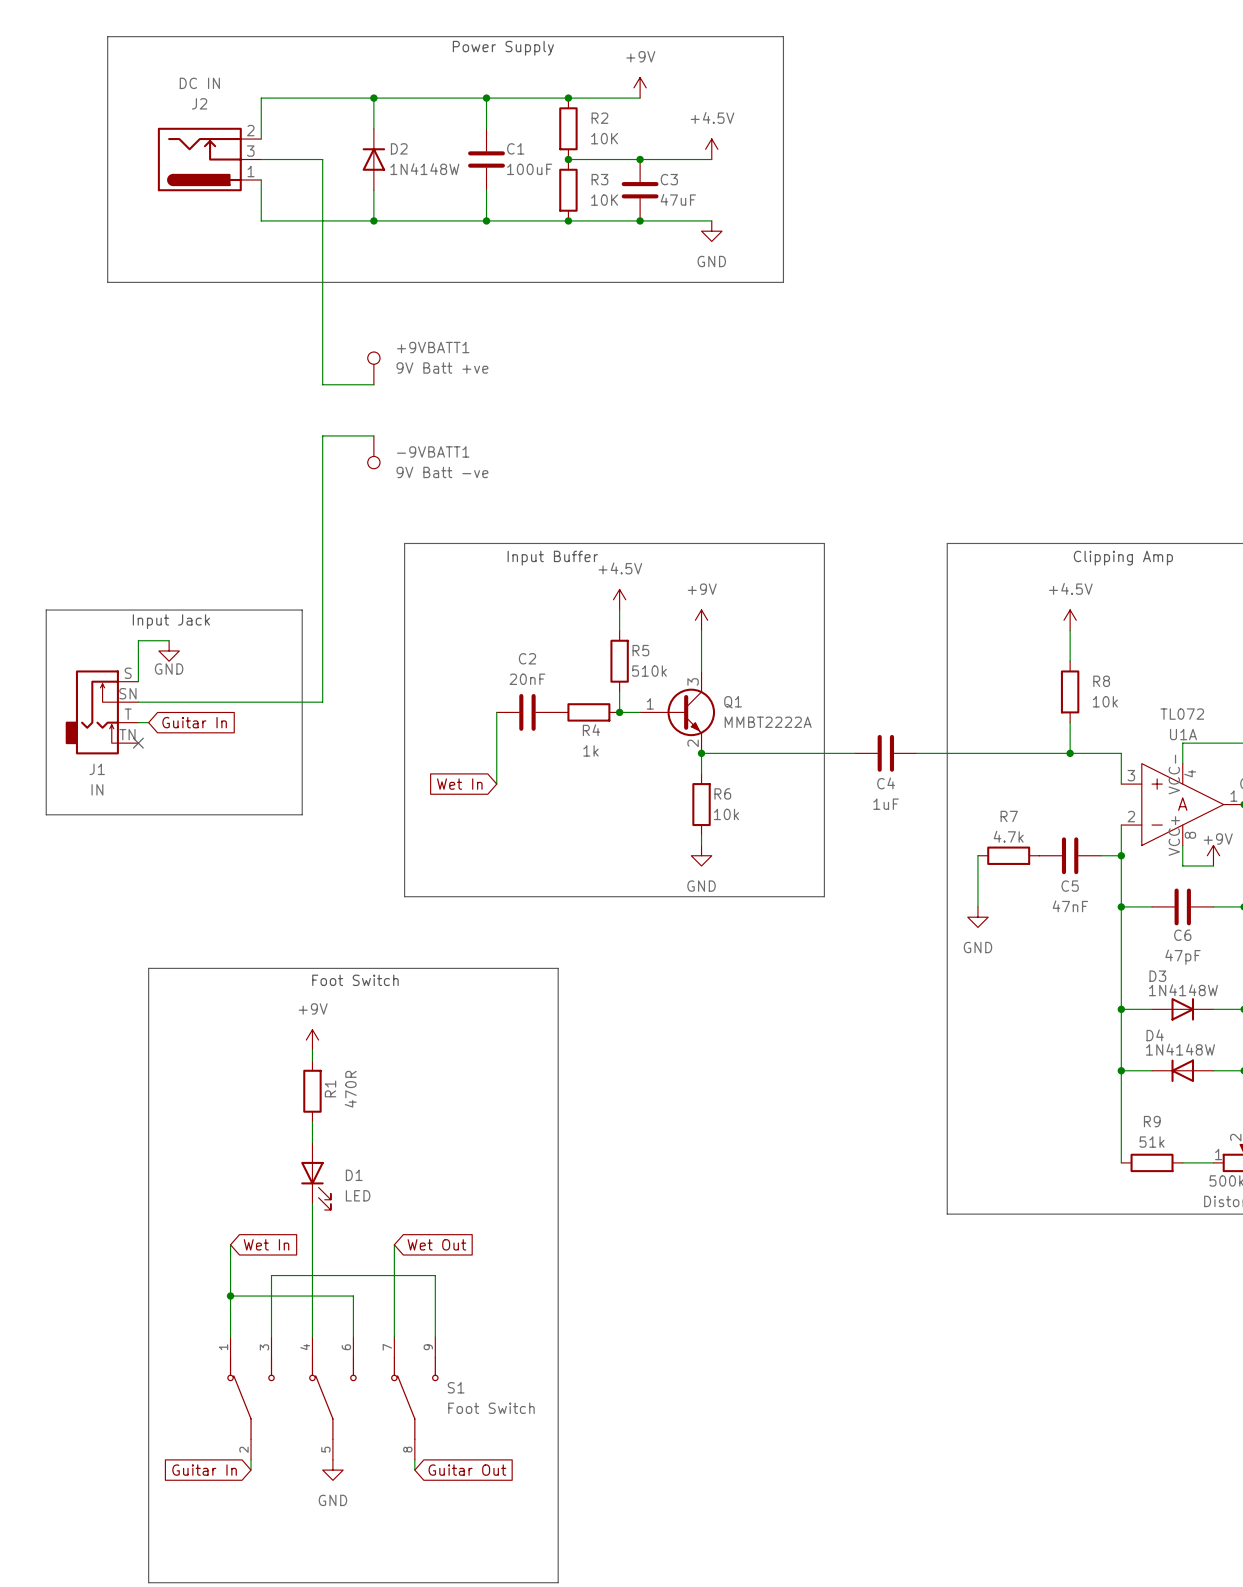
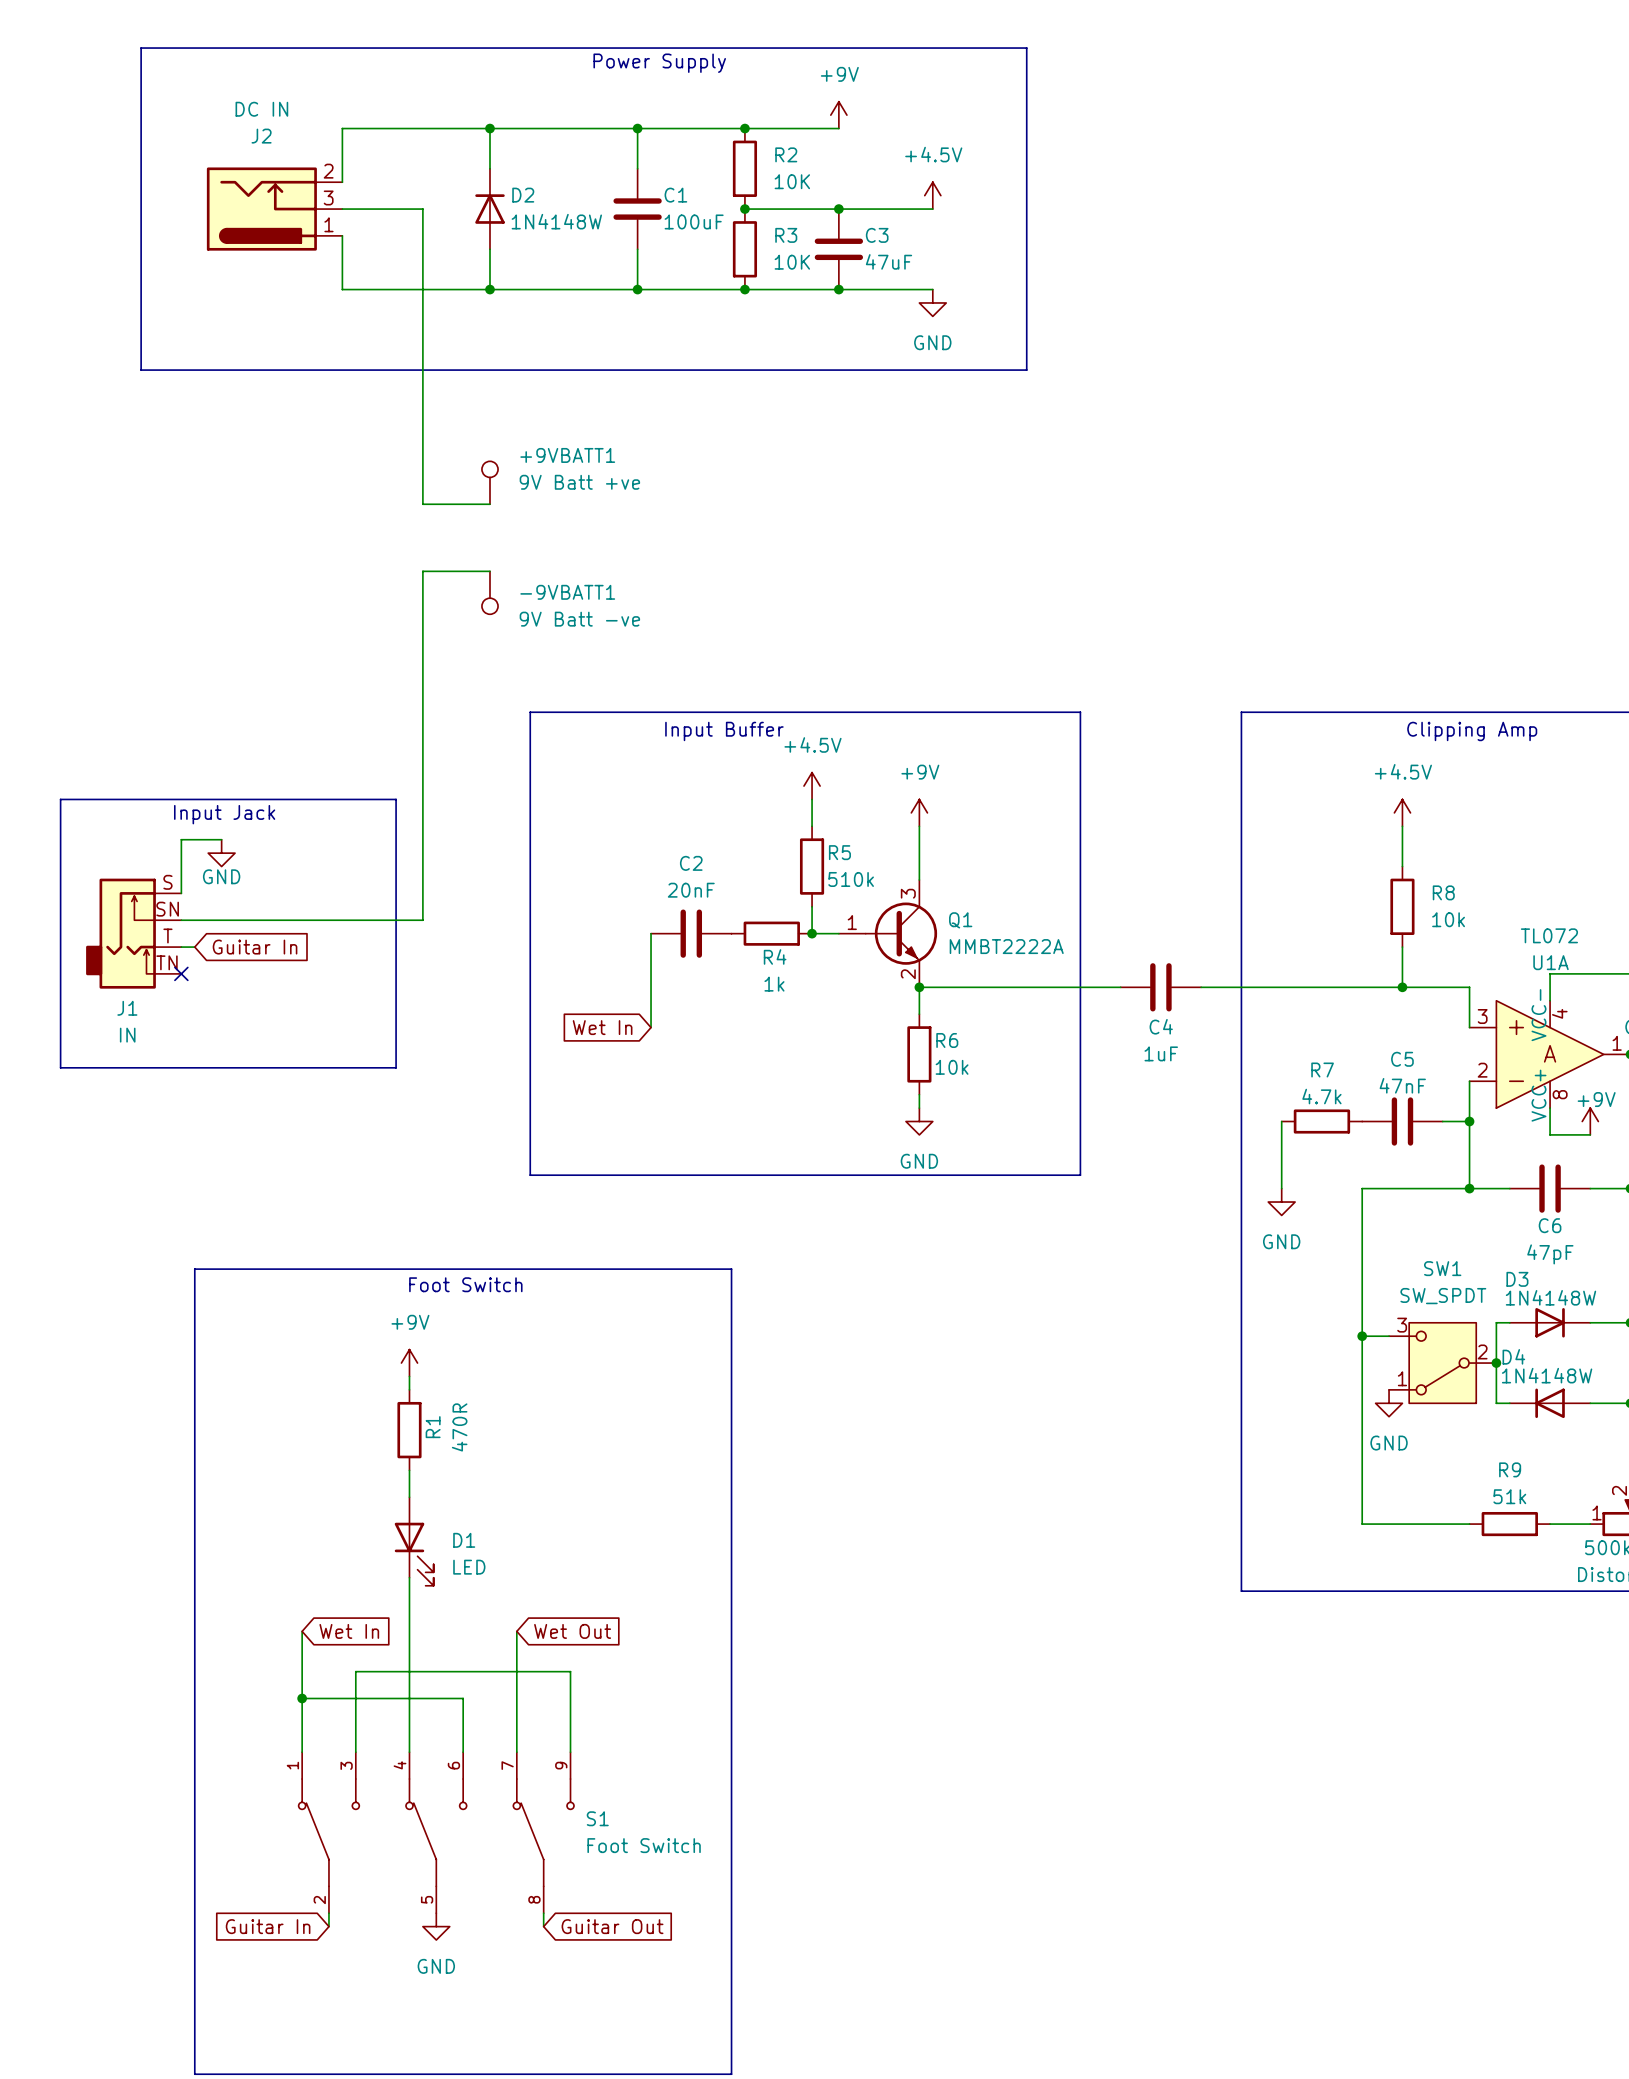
C5 name position: C5 (1070, 886) -> C5 (1402, 1059)
C5 value position: 47nF (1070, 906) -> 47nF (1402, 1085)
wire: (1121, 906) (1121, 1162) -> (1469, 1188) (1362, 1188) (1362, 1524) (1469, 1524)
wire: (1121, 1009) (1141, 1009) -> (1496, 1403) (1496, 1322)
junction: (1121, 1009) -> none
junction: none -> (1362, 1336)
SW1: none -> SW_SPDT (1442, 1363)
junction: none -> (1496, 1363)
power symbol: none -> GND (1389, 1403)
wire: (1121, 1070) (1141, 1070) -> (1362, 1336) (1389, 1336)
junction: (1121, 1070) -> none

